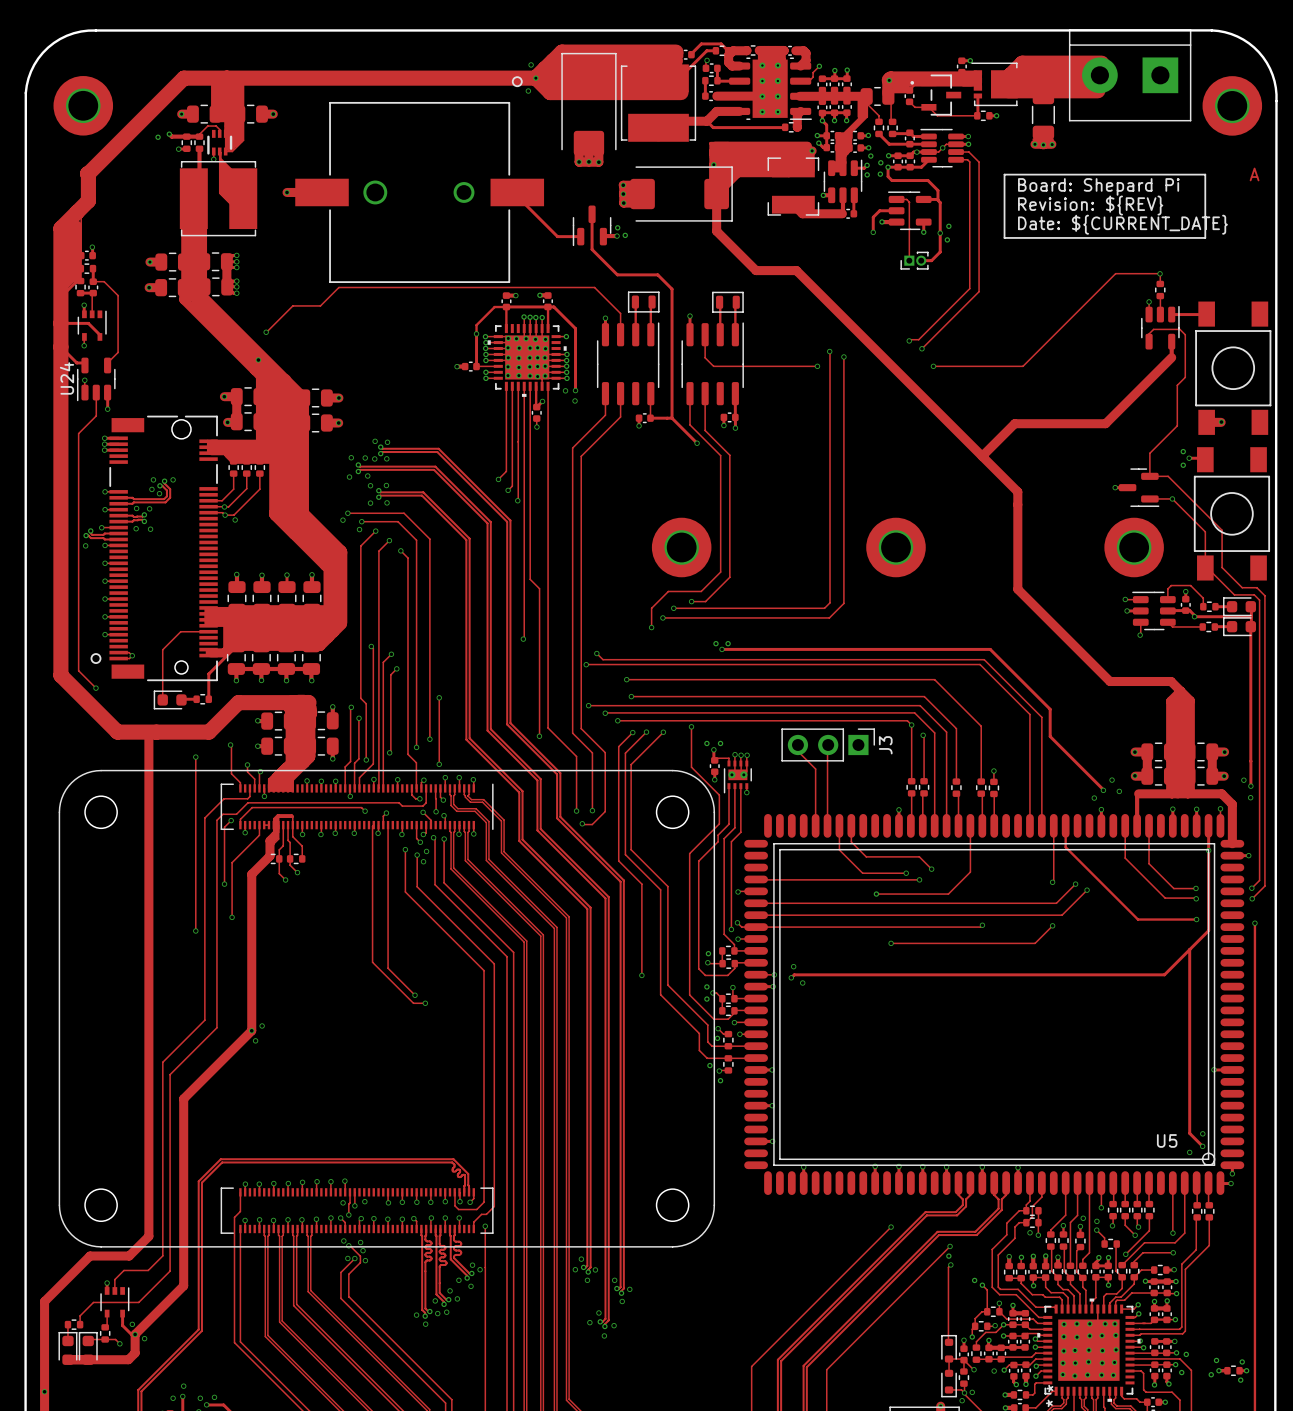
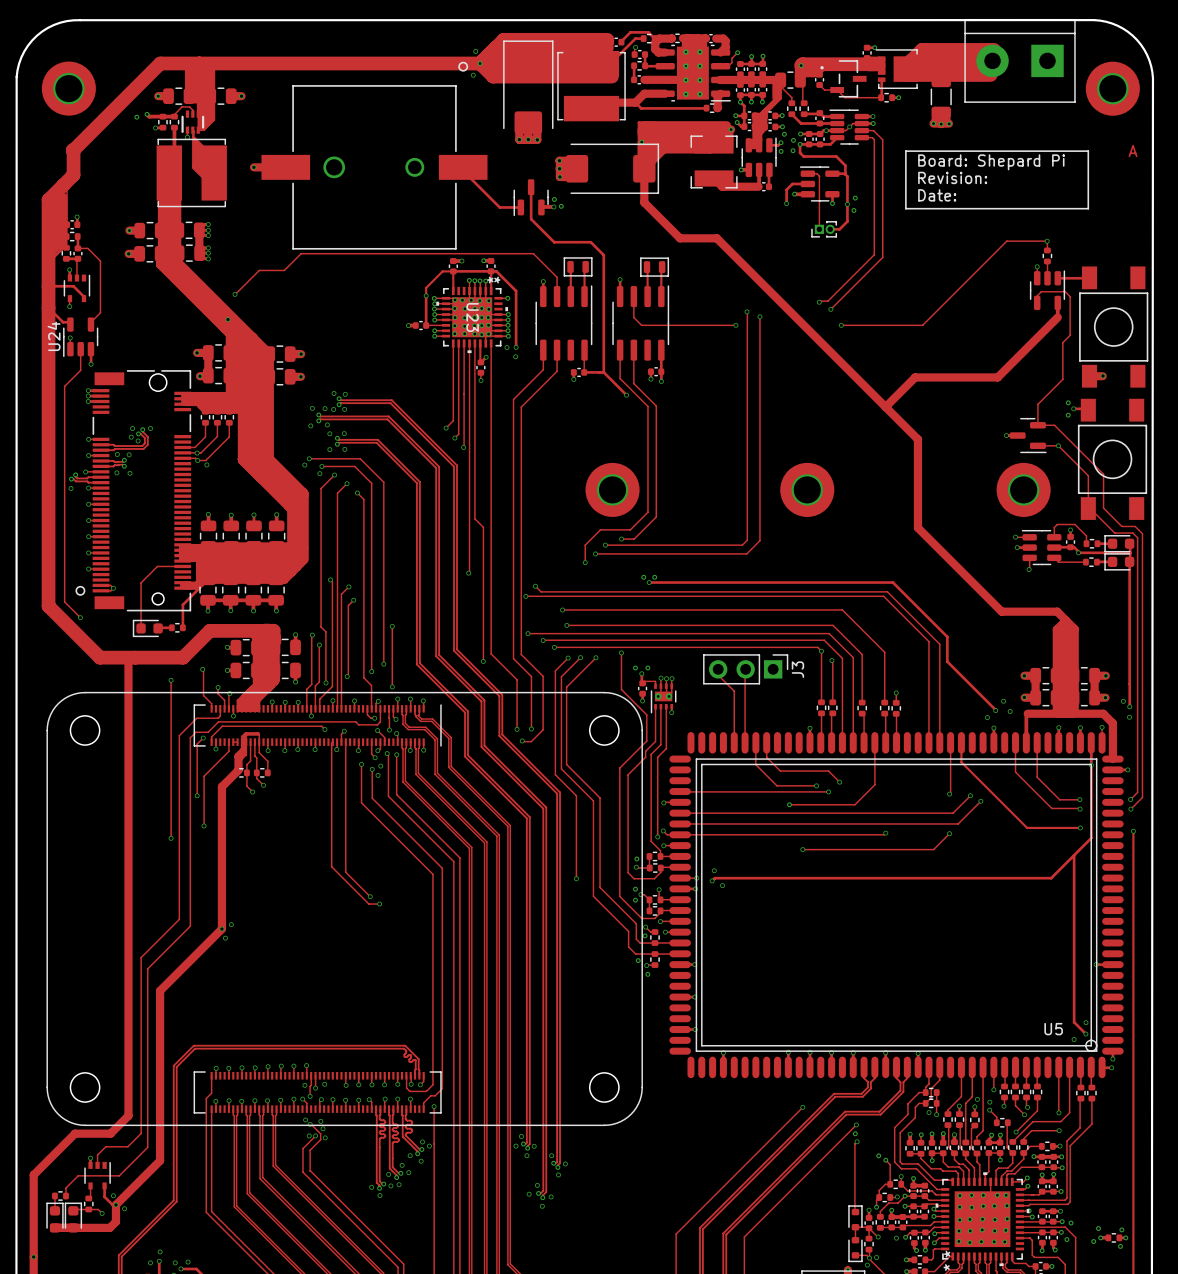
text: Revision: ${REV} (1090, 205) -> Revision: (952, 177)
text: Date: ${CURRENT_DATE} (1122, 224) -> Date: (937, 195)
U23 footprint: [487, 324, 567, 397] -> [436, 286, 509, 354]
U23 name: none -> U23 (472, 317)

